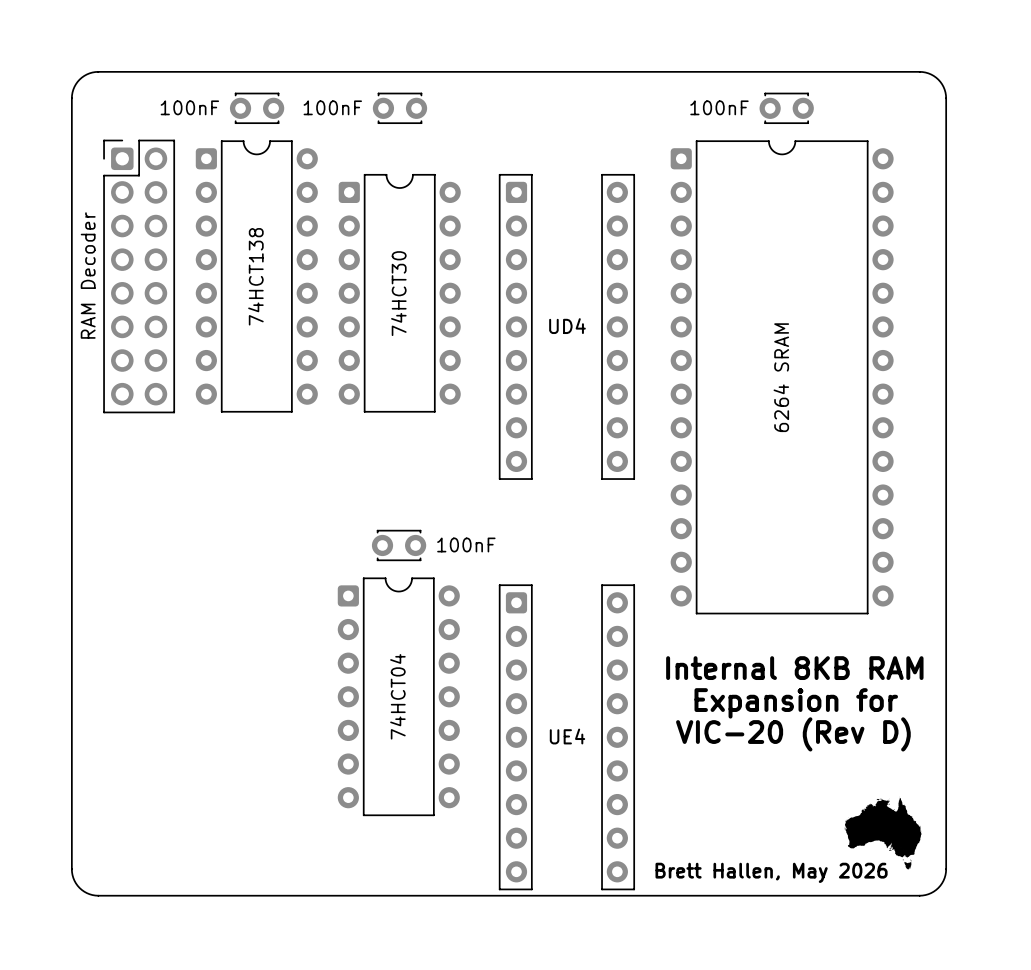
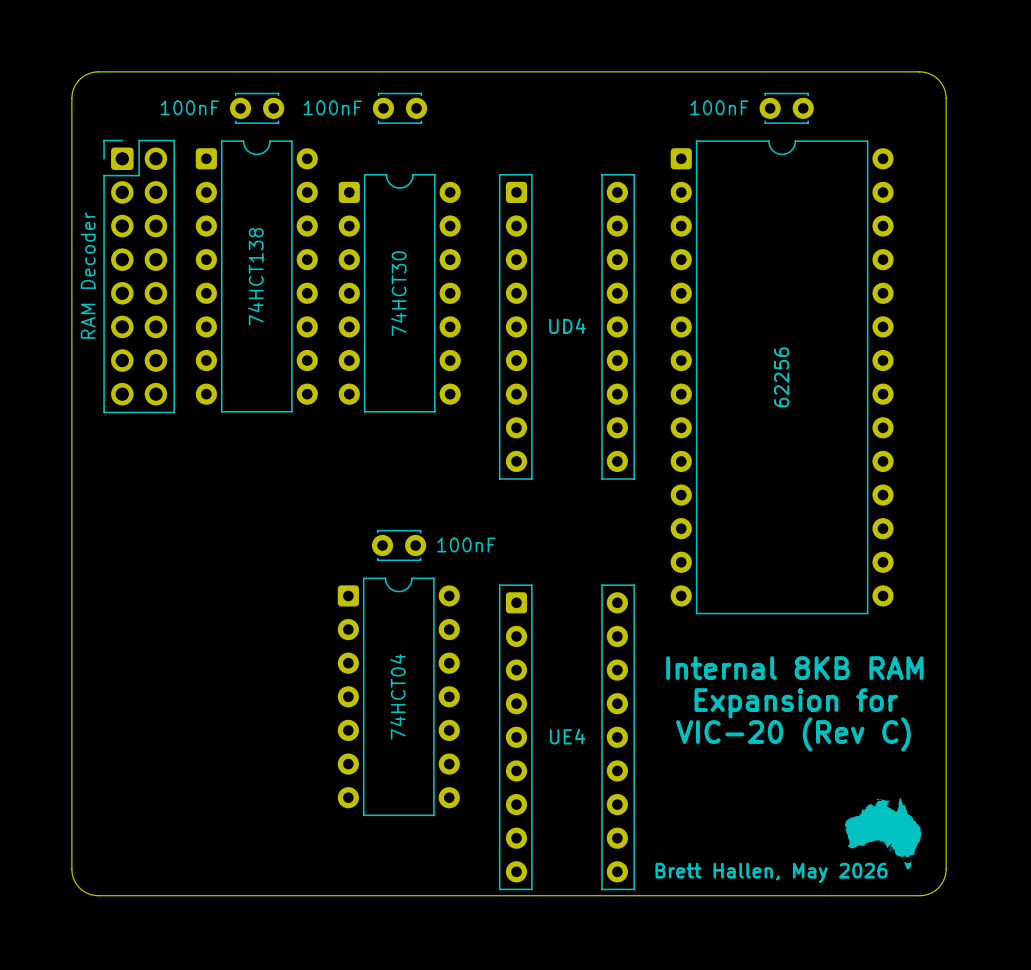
part value: 6264 SRAM (781, 377) -> 62256 (781, 377)
text: VIC-20 (Rev D) (793, 734) -> VIC-20 (Rev C) (793, 734)

